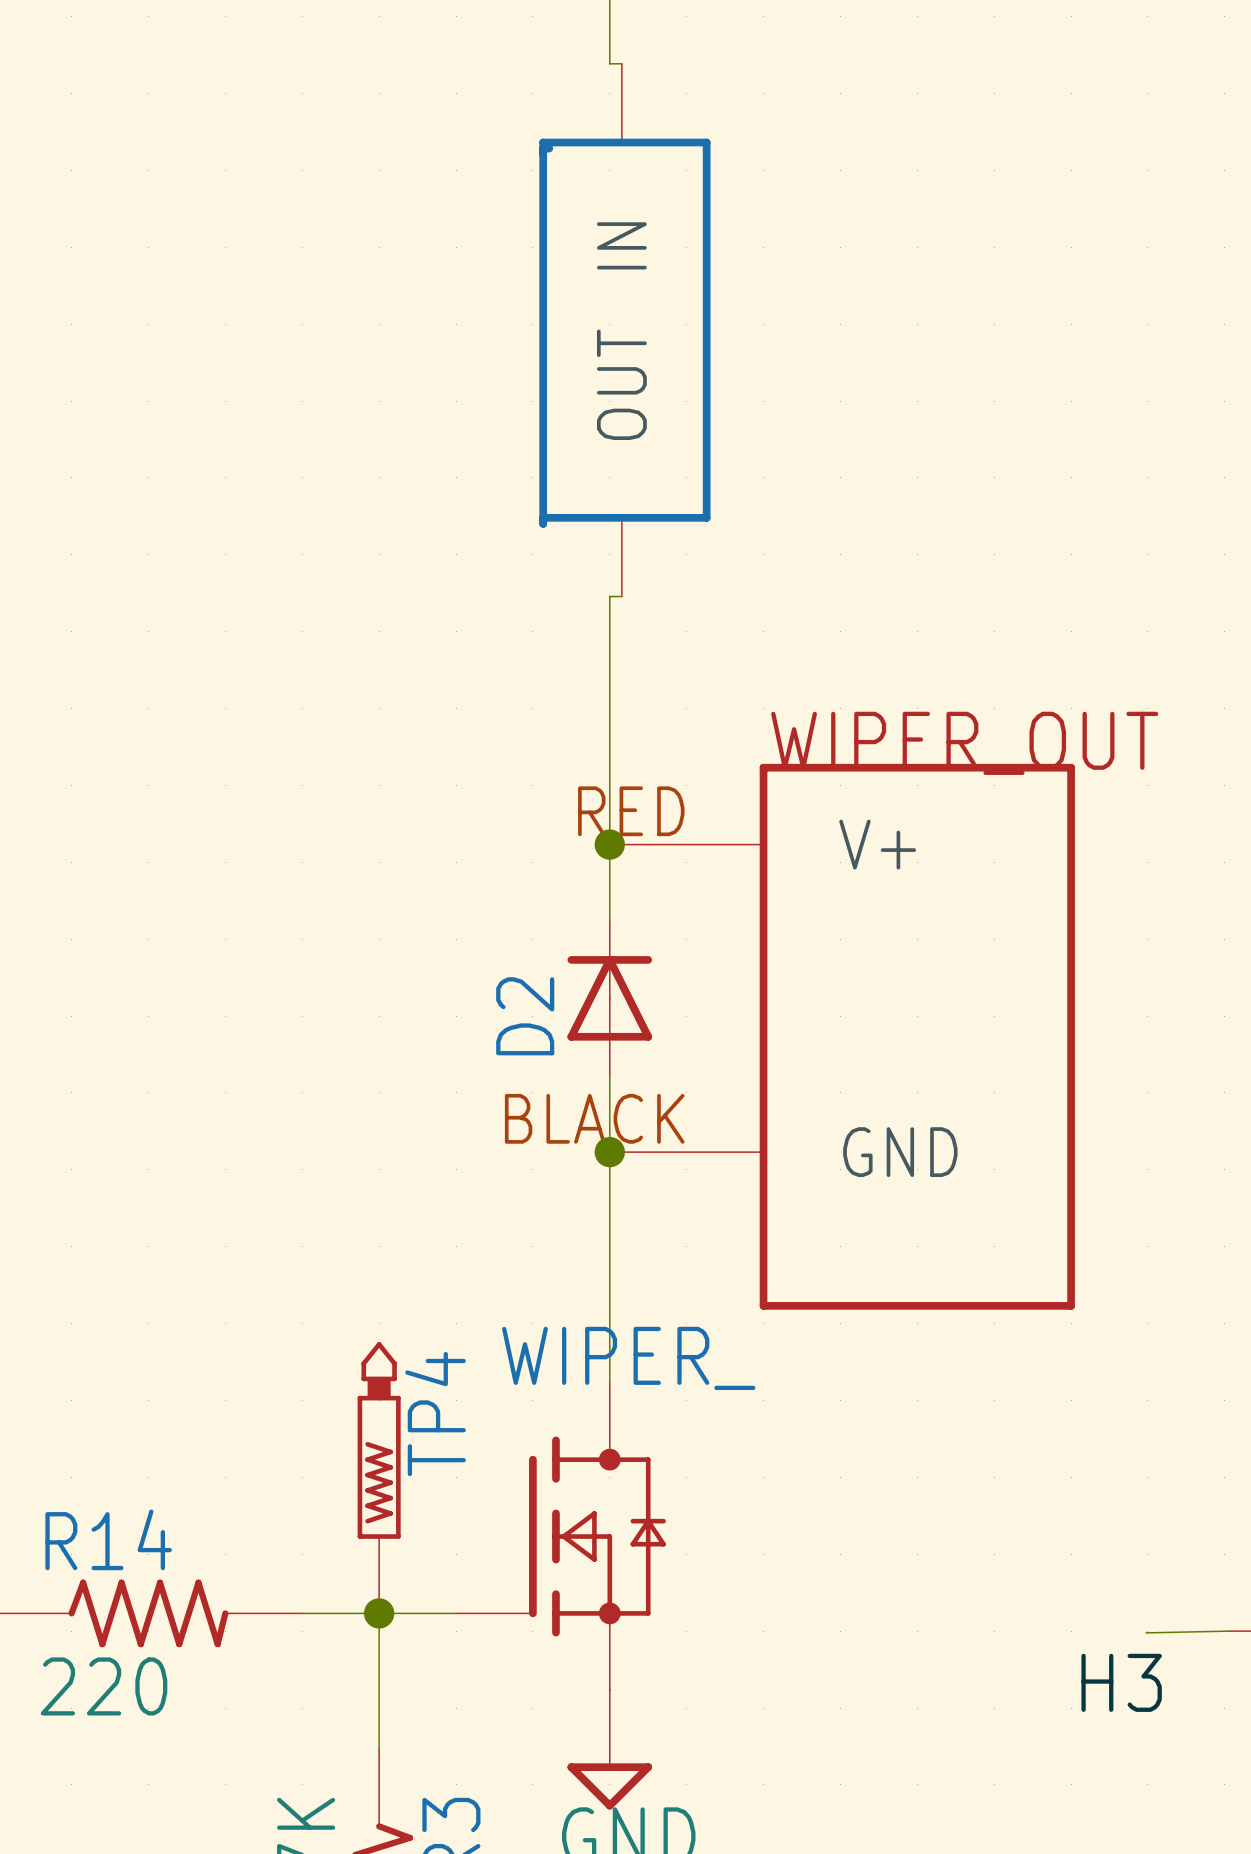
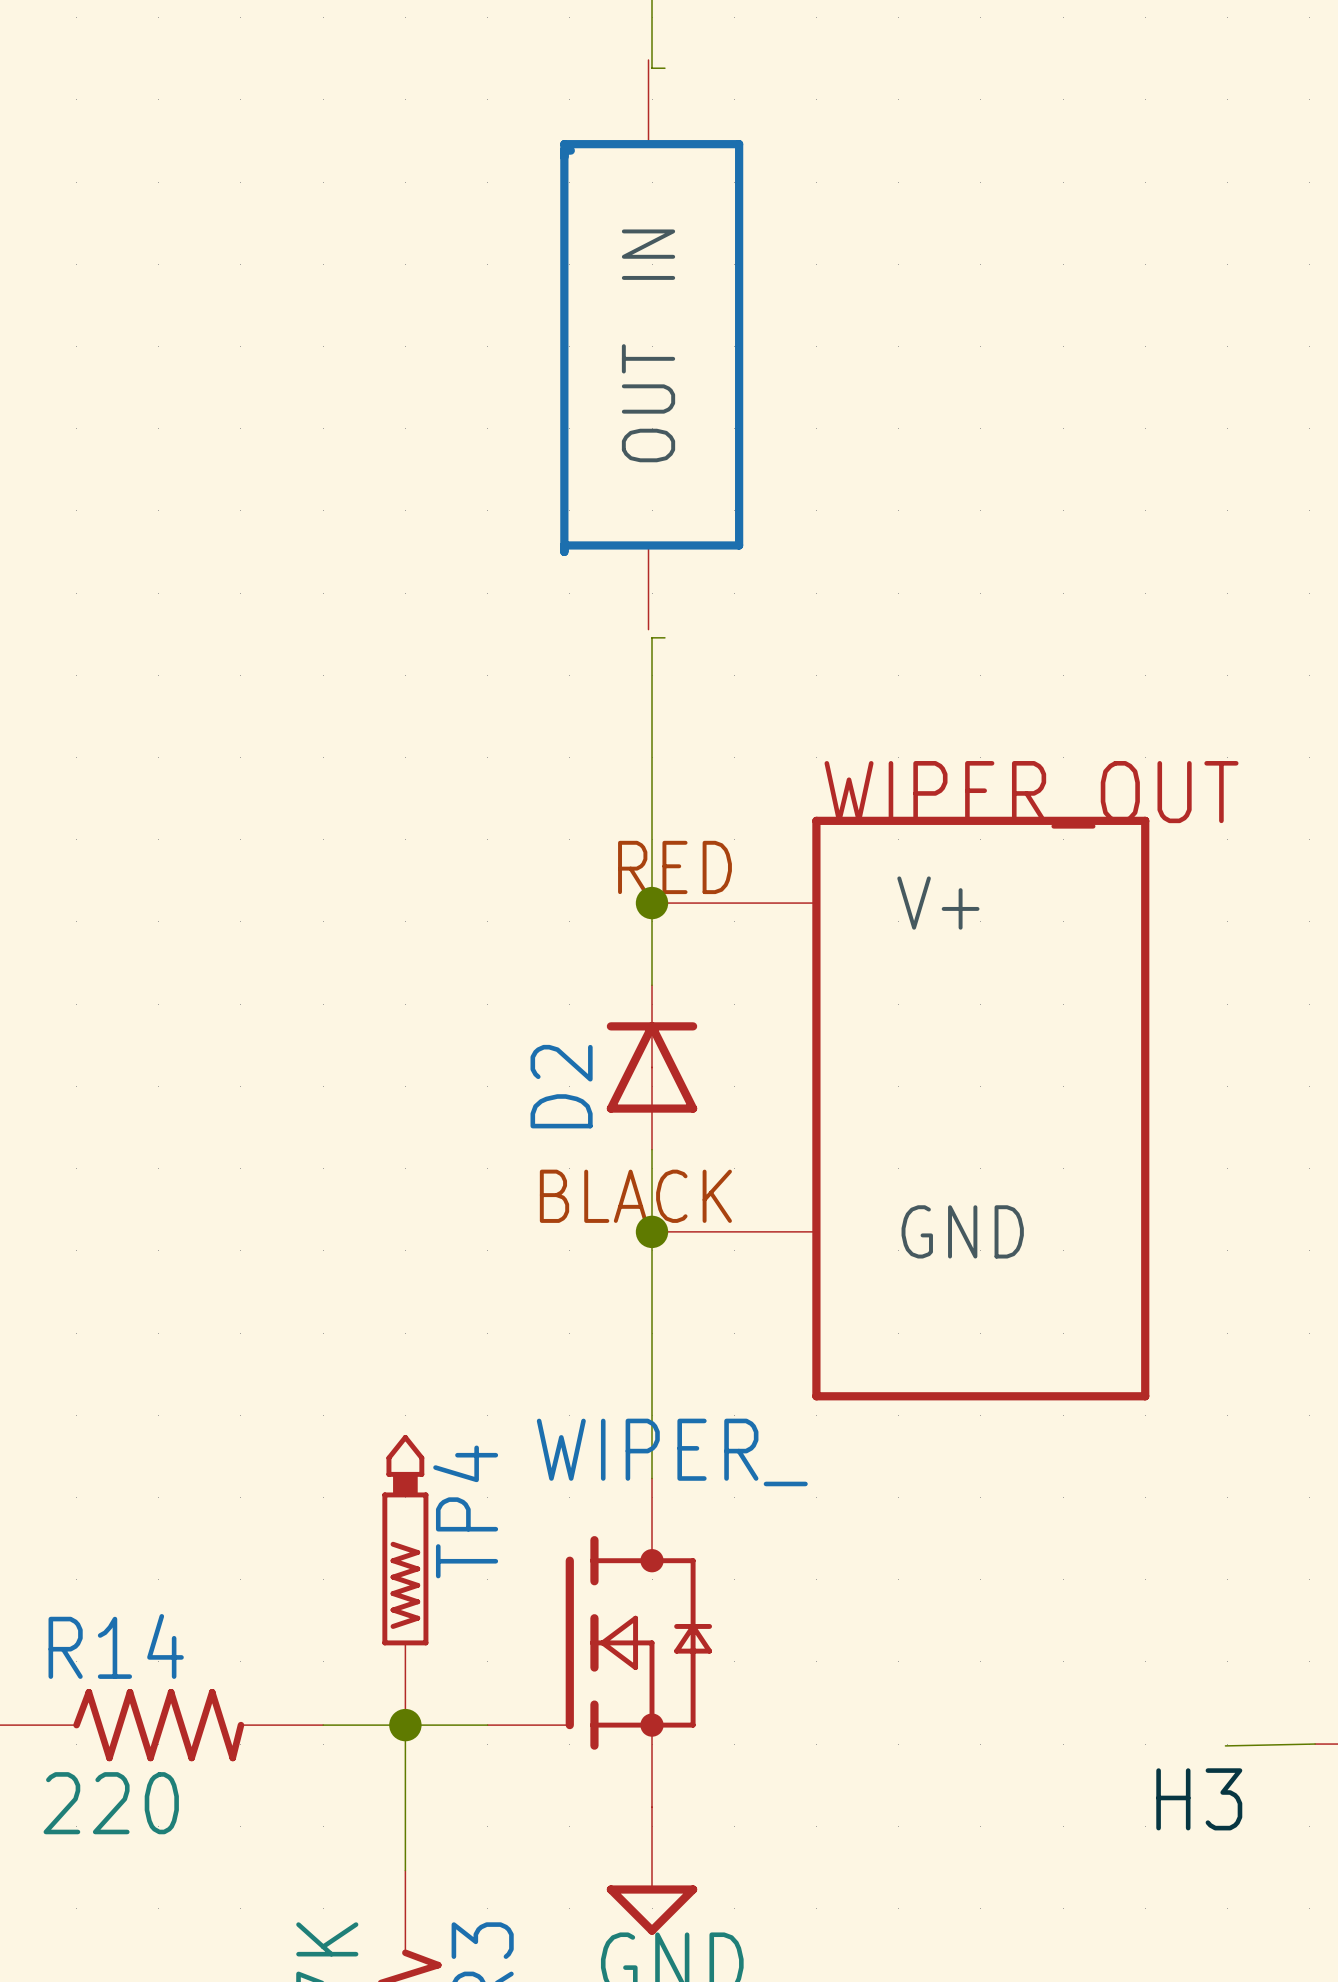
part position: (624, 330) -> (651, 344)

